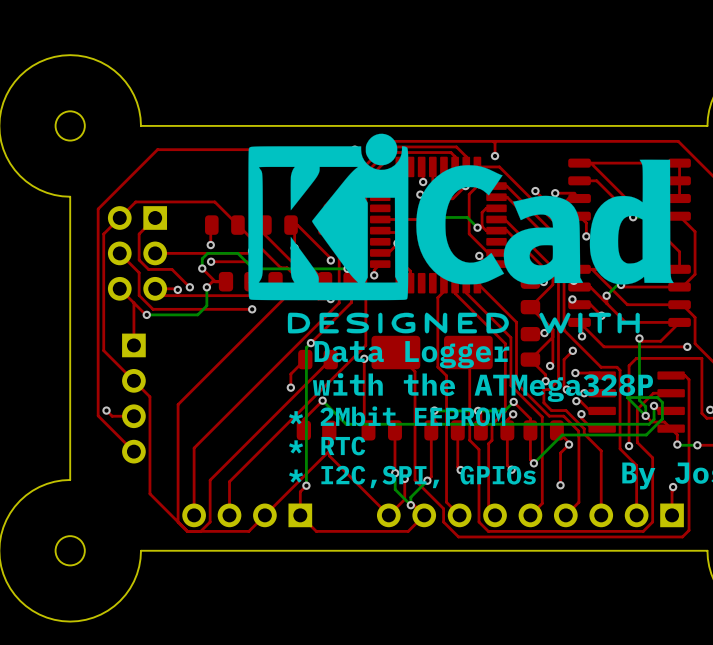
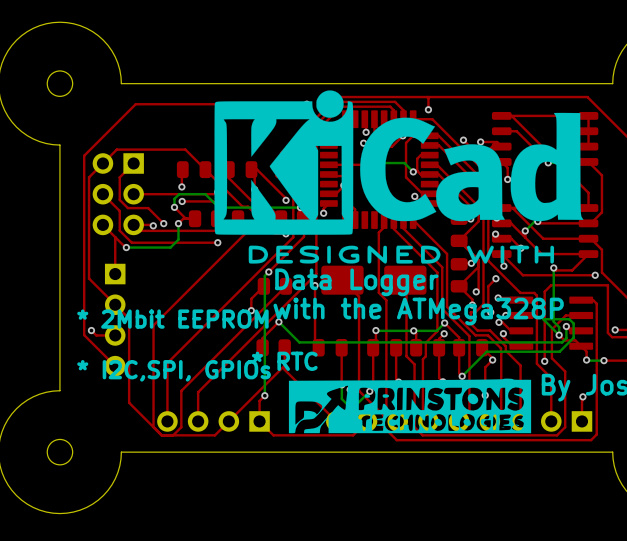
text position: * 2Mbit EEPROM (397, 416) -> * 2Mbit EEPROM (172, 319)
drawing: none -> [288, 378, 532, 434]
text position: * I2C,SPI, GPIOs (412, 476) -> * I2C,SPI, GPIOs (174, 370)

